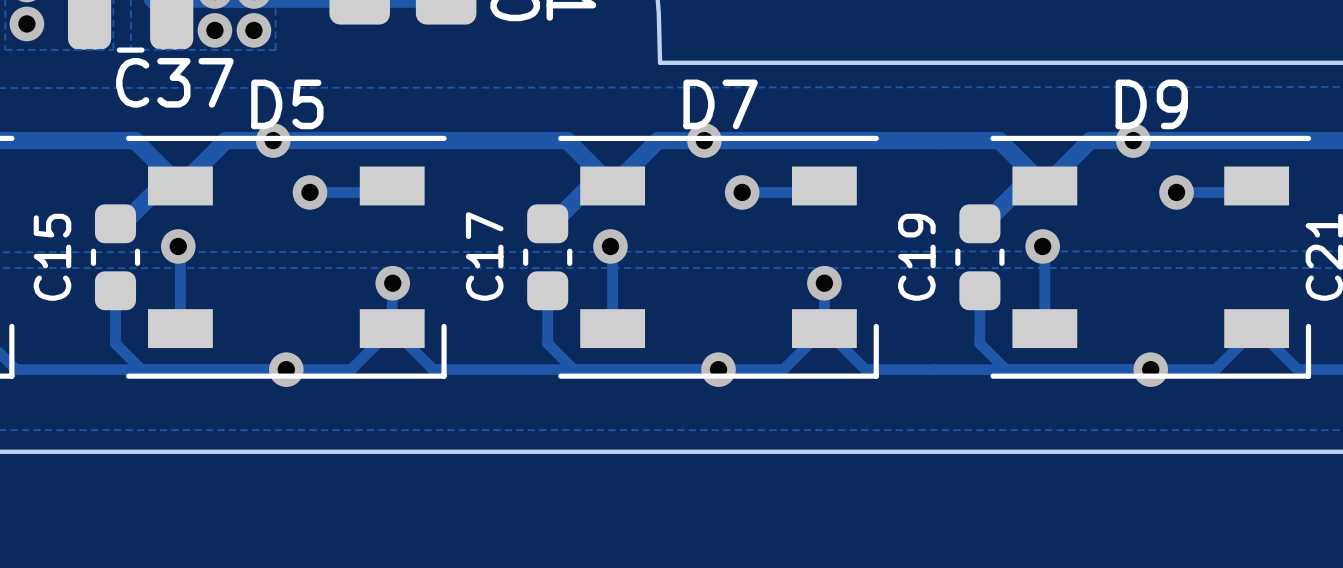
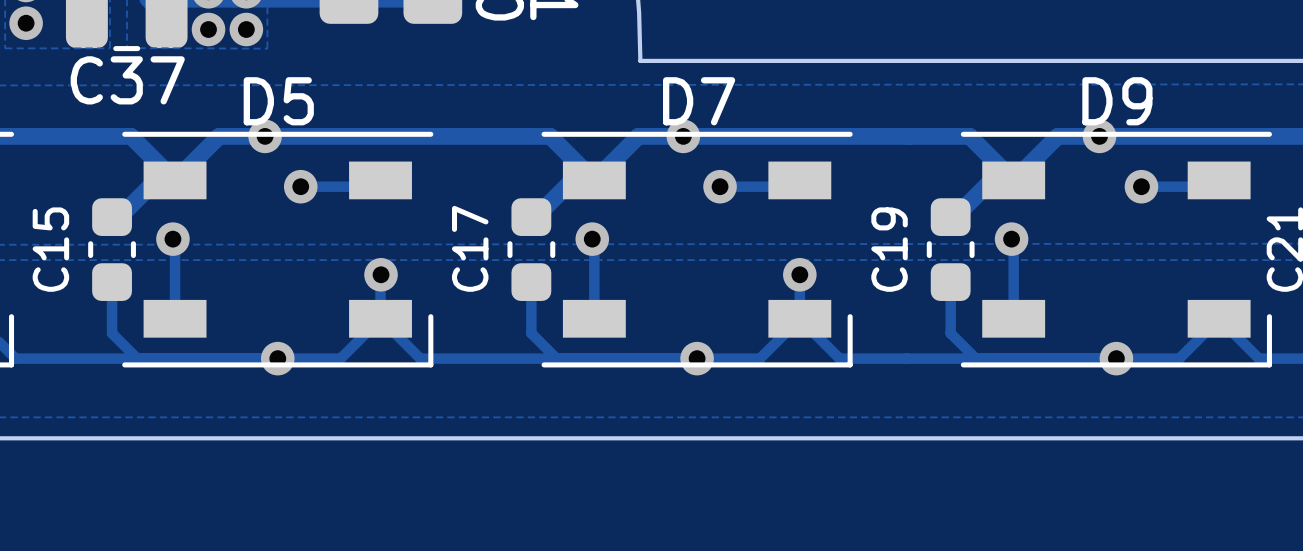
C37 name position: C37 (174, 82) -> C37 (127, 80)

